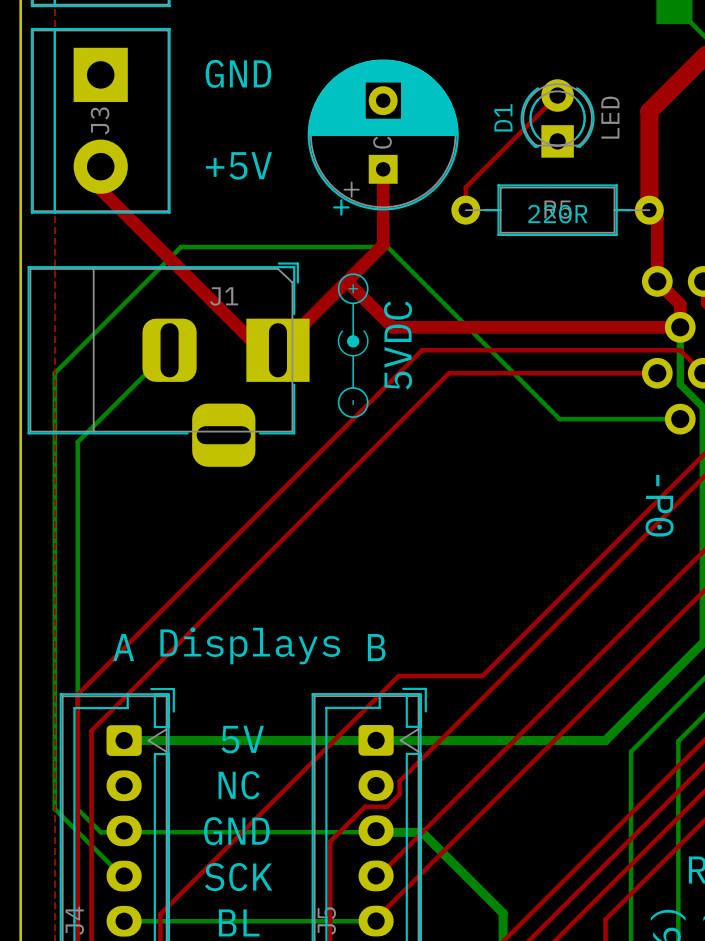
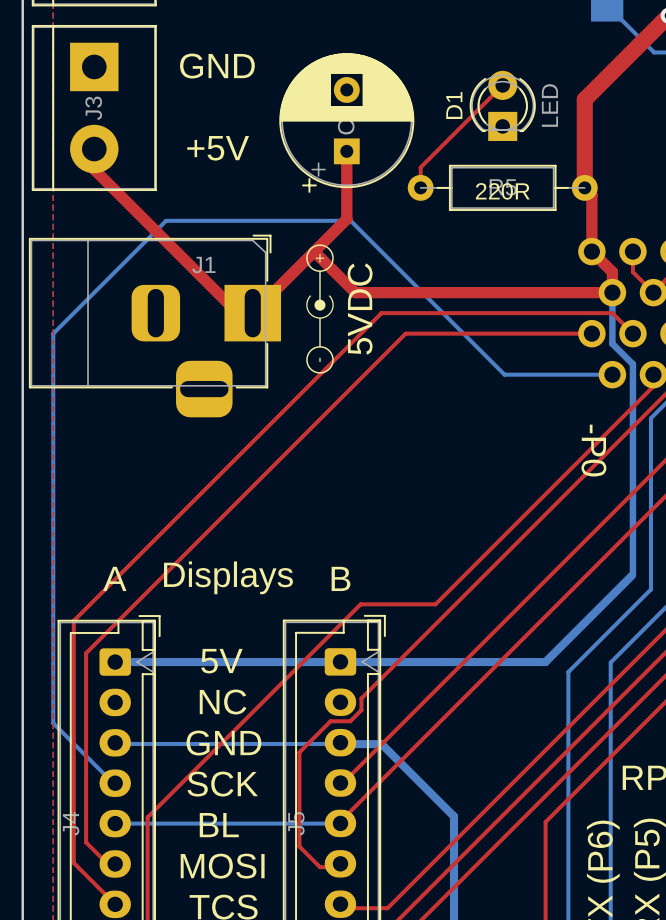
bottom track: (169, 350) (77, 442) (77, 809) (100, 832) (124, 832) -> none

